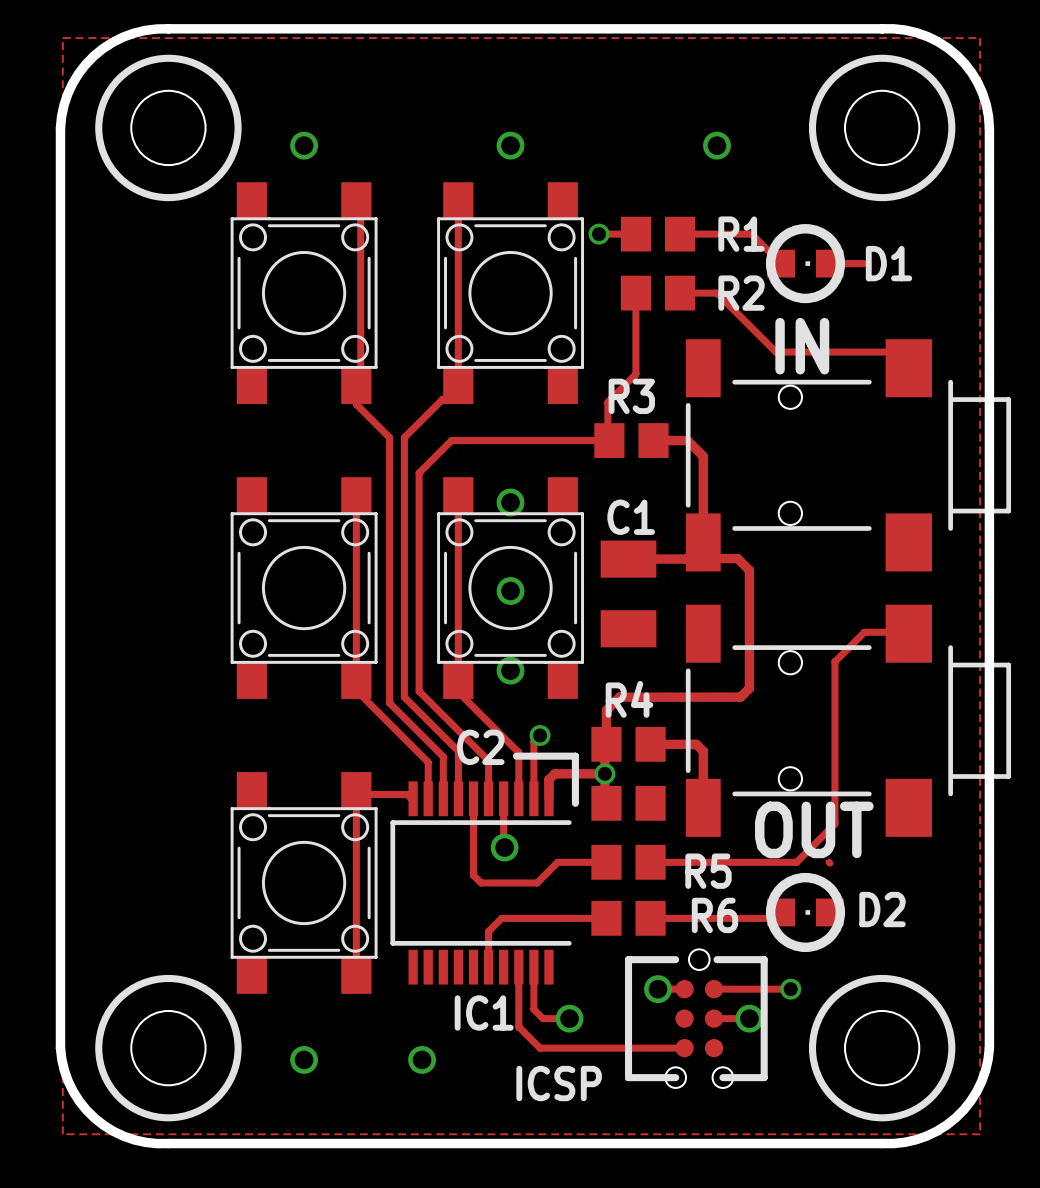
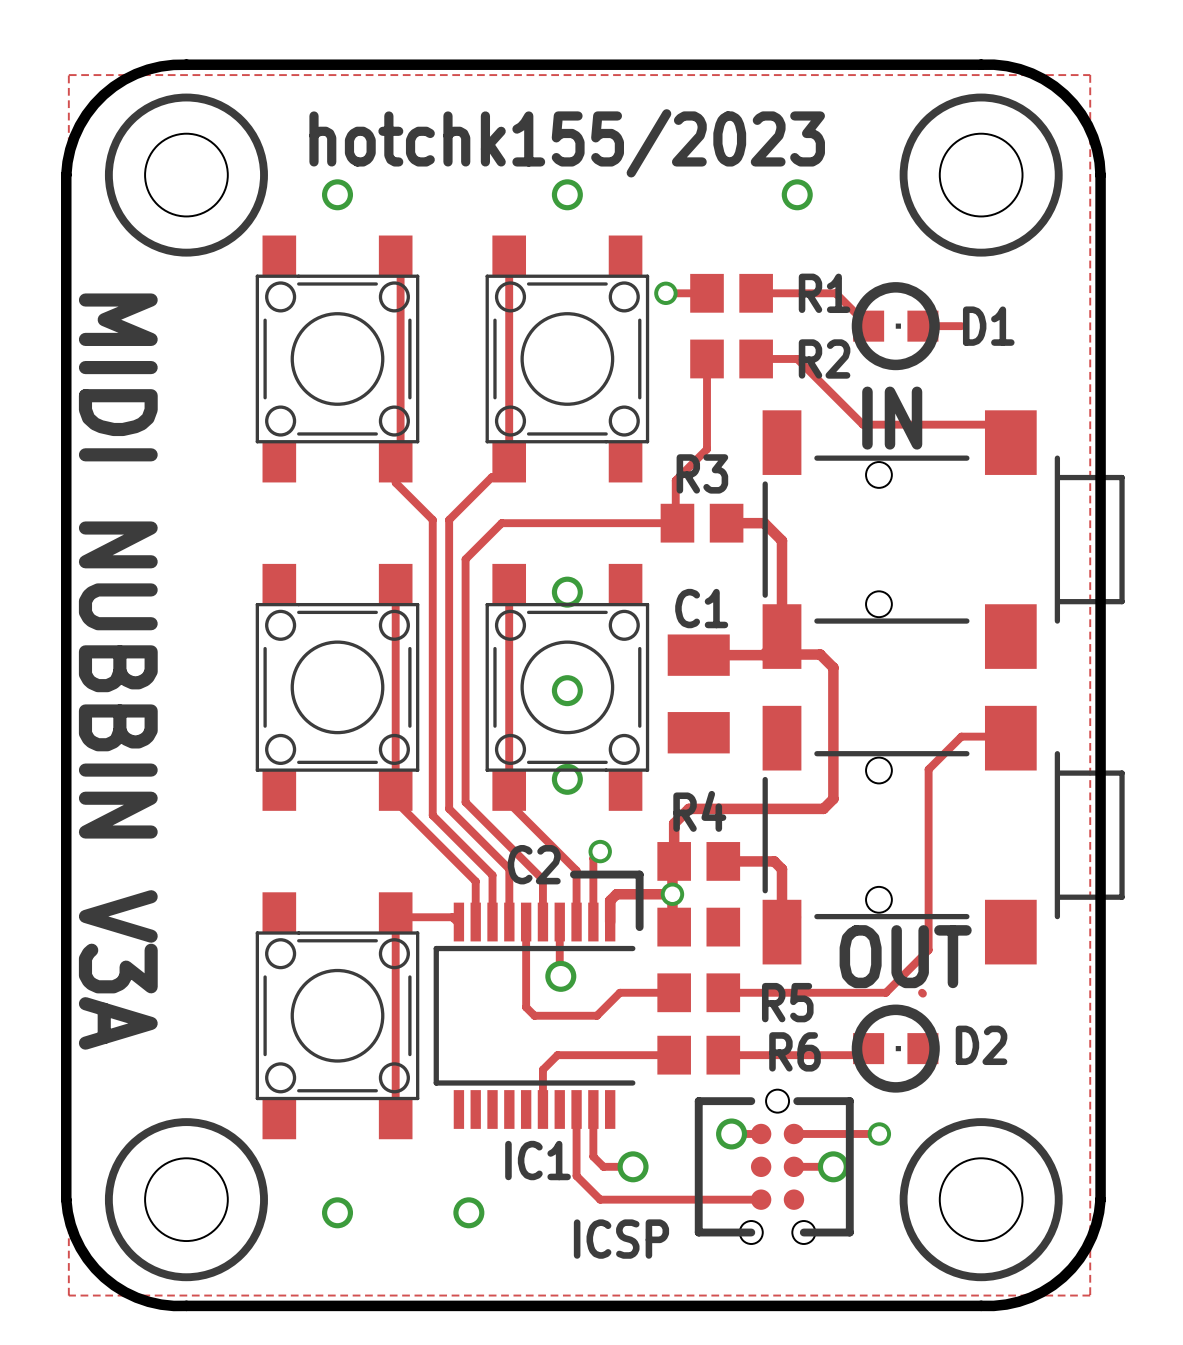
text: none -> hotchk155/2023 (567, 143)
text: none -> MIDI NUBBIN V3A (118, 671)

